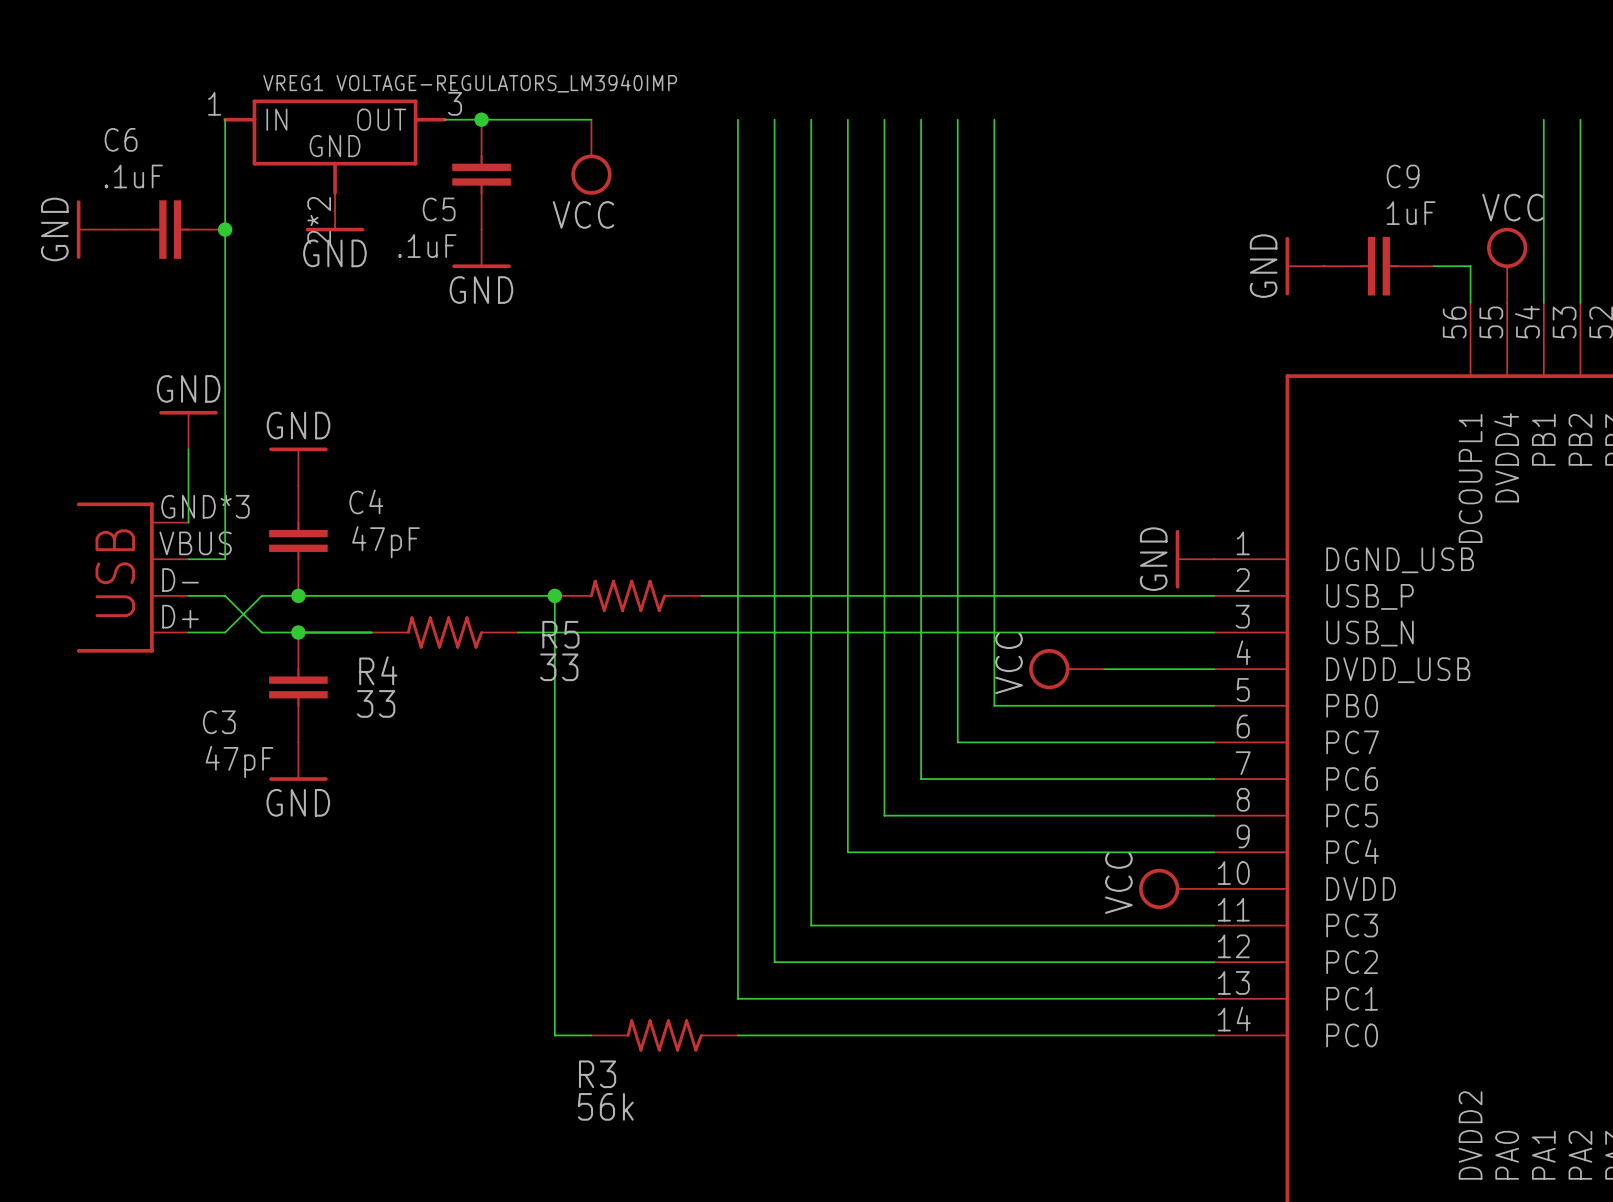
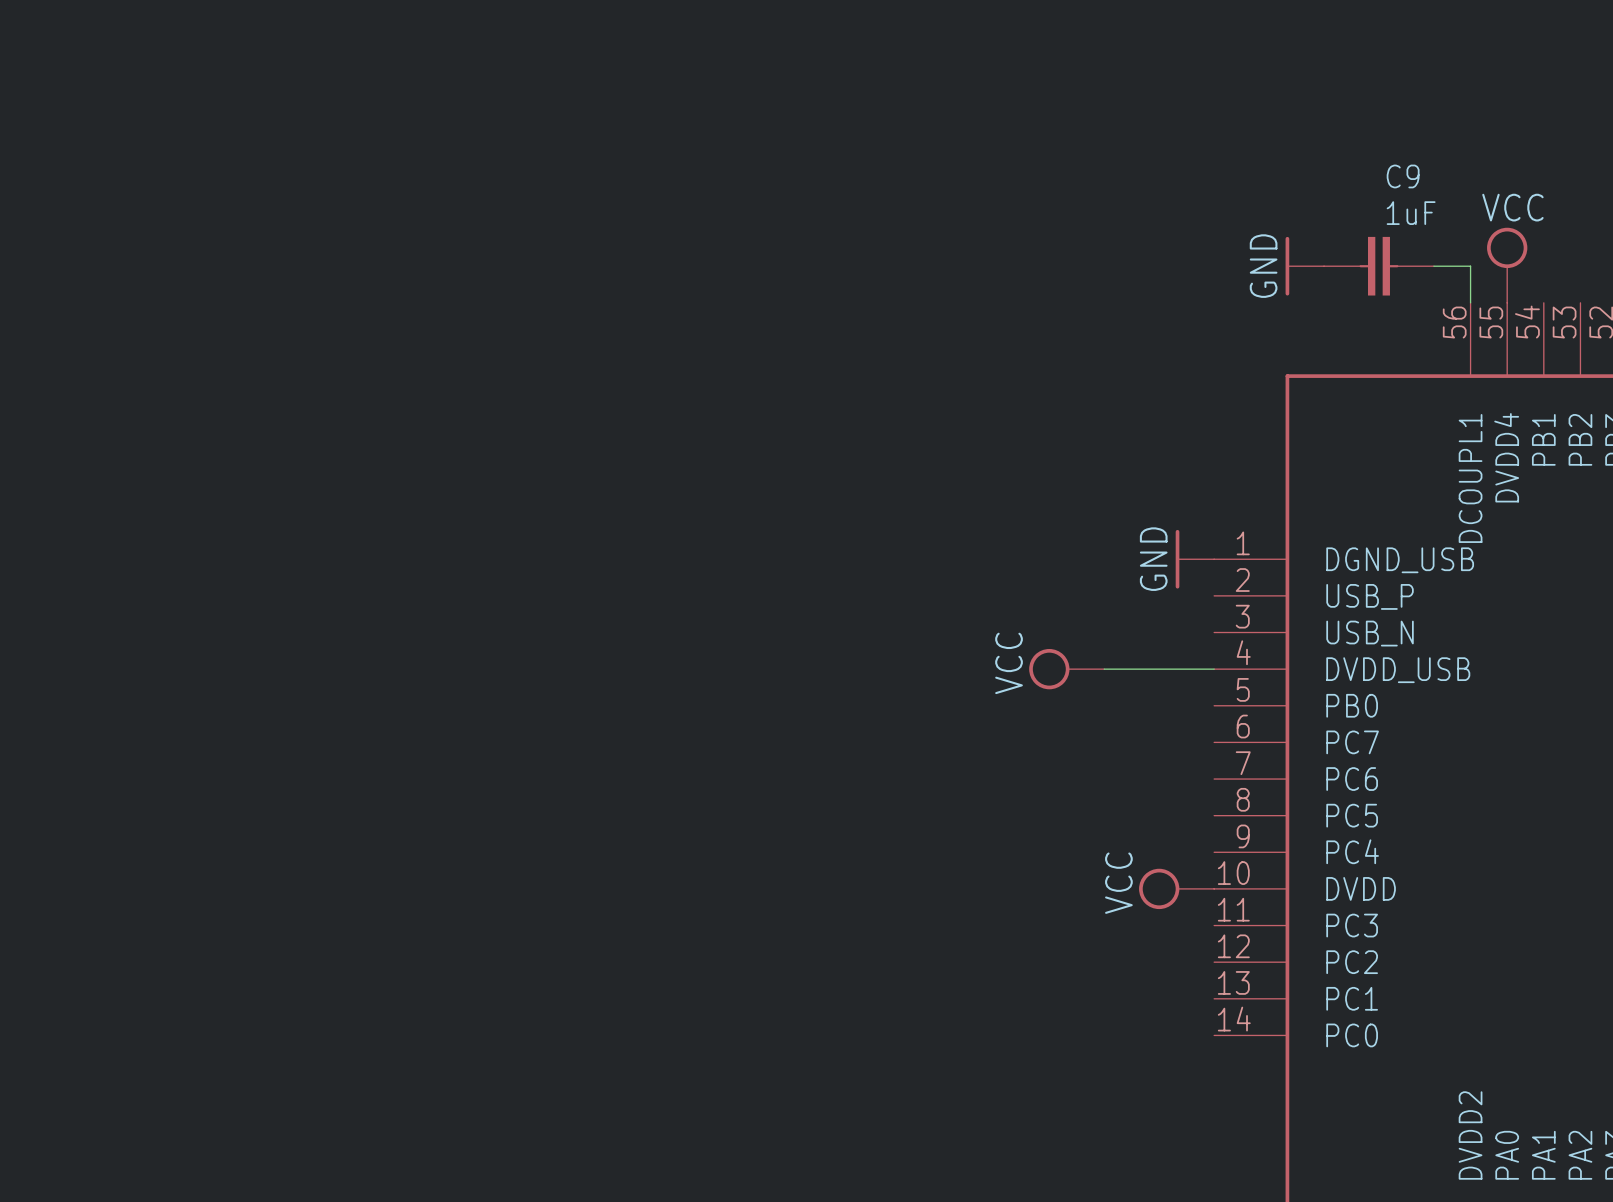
wire: (225, 119) (225, 559) (188, 559) -> none
wire: (444, 119) (591, 119) -> none
junction: (481, 119) -> none
wire: (737, 119) (737, 998) (1214, 998) -> none
wire: (774, 119) (774, 962) (1214, 962) -> none
wire: (811, 119) (811, 925) (1214, 925) -> none
wire: (847, 119) (847, 852) (1214, 852) -> none
wire: (884, 119) (884, 815) (1214, 815) -> none
wire: (921, 119) (921, 779) (1214, 779) -> none
wire: (957, 119) (957, 742) (1214, 742) -> none
wire: (994, 119) (994, 705) (1214, 705) -> none
wire: (1543, 119) (1543, 302) -> none
wire: (1580, 119) (1580, 302) -> none
VREG1: VOLTAGE-REGULATORS_LM3940IMP (335, 147) -> none
power symbol: VCC (591, 157) -> none
C5: .1uF (481, 174) -> none
power symbol: GND (335, 212) -> none
power symbol: GND (96, 229) -> none
C6: .1uF (170, 229) -> none
junction: (225, 229) -> none
power symbol: GND (481, 248) -> none
power symbol: GND (188, 430) -> none
wire: (188, 449) (188, 522) -> none
power symbol: GND (298, 466) -> none
C4: 47pF (298, 540) -> none
part: (132, 577) -> none
wire: (188, 595) (225, 595) (261, 632) (371, 632) -> none
junction: (298, 595) -> none
junction: (554, 595) -> none
R5: 33 (628, 595) -> none
wire: (701, 595) (1214, 595) -> none
wire: (188, 632) (225, 632) (261, 595) (554, 595) (554, 1035) (591, 1035) -> none
junction: (298, 632) -> none
R4: 33 (444, 632) -> none
wire: (518, 632) (1214, 632) -> none
C3: 47pF (298, 687) -> none
power symbol: GND (298, 761) -> none
R3: 56k (664, 1035) -> none
wire: (737, 1035) (1214, 1035) -> none

